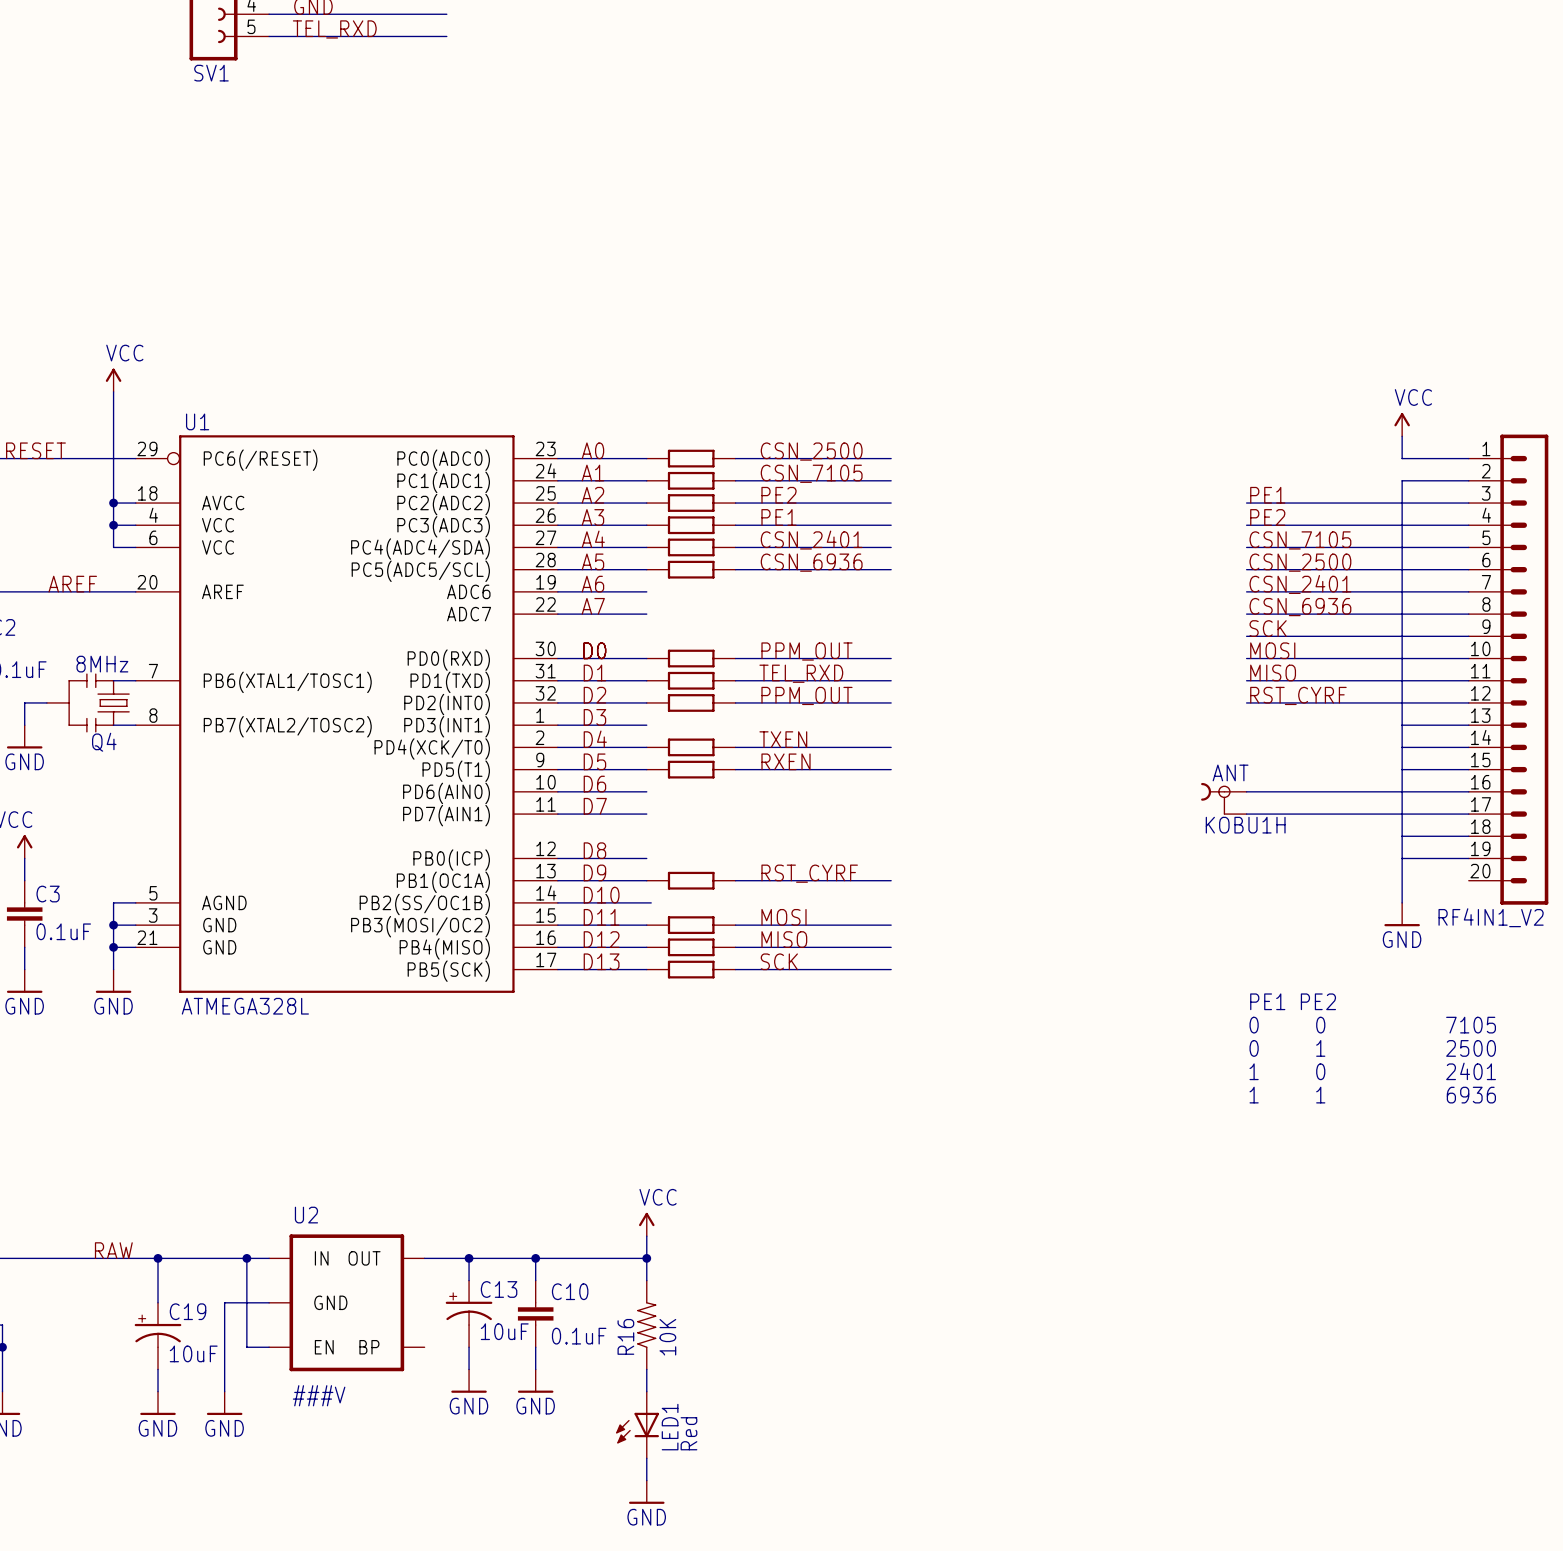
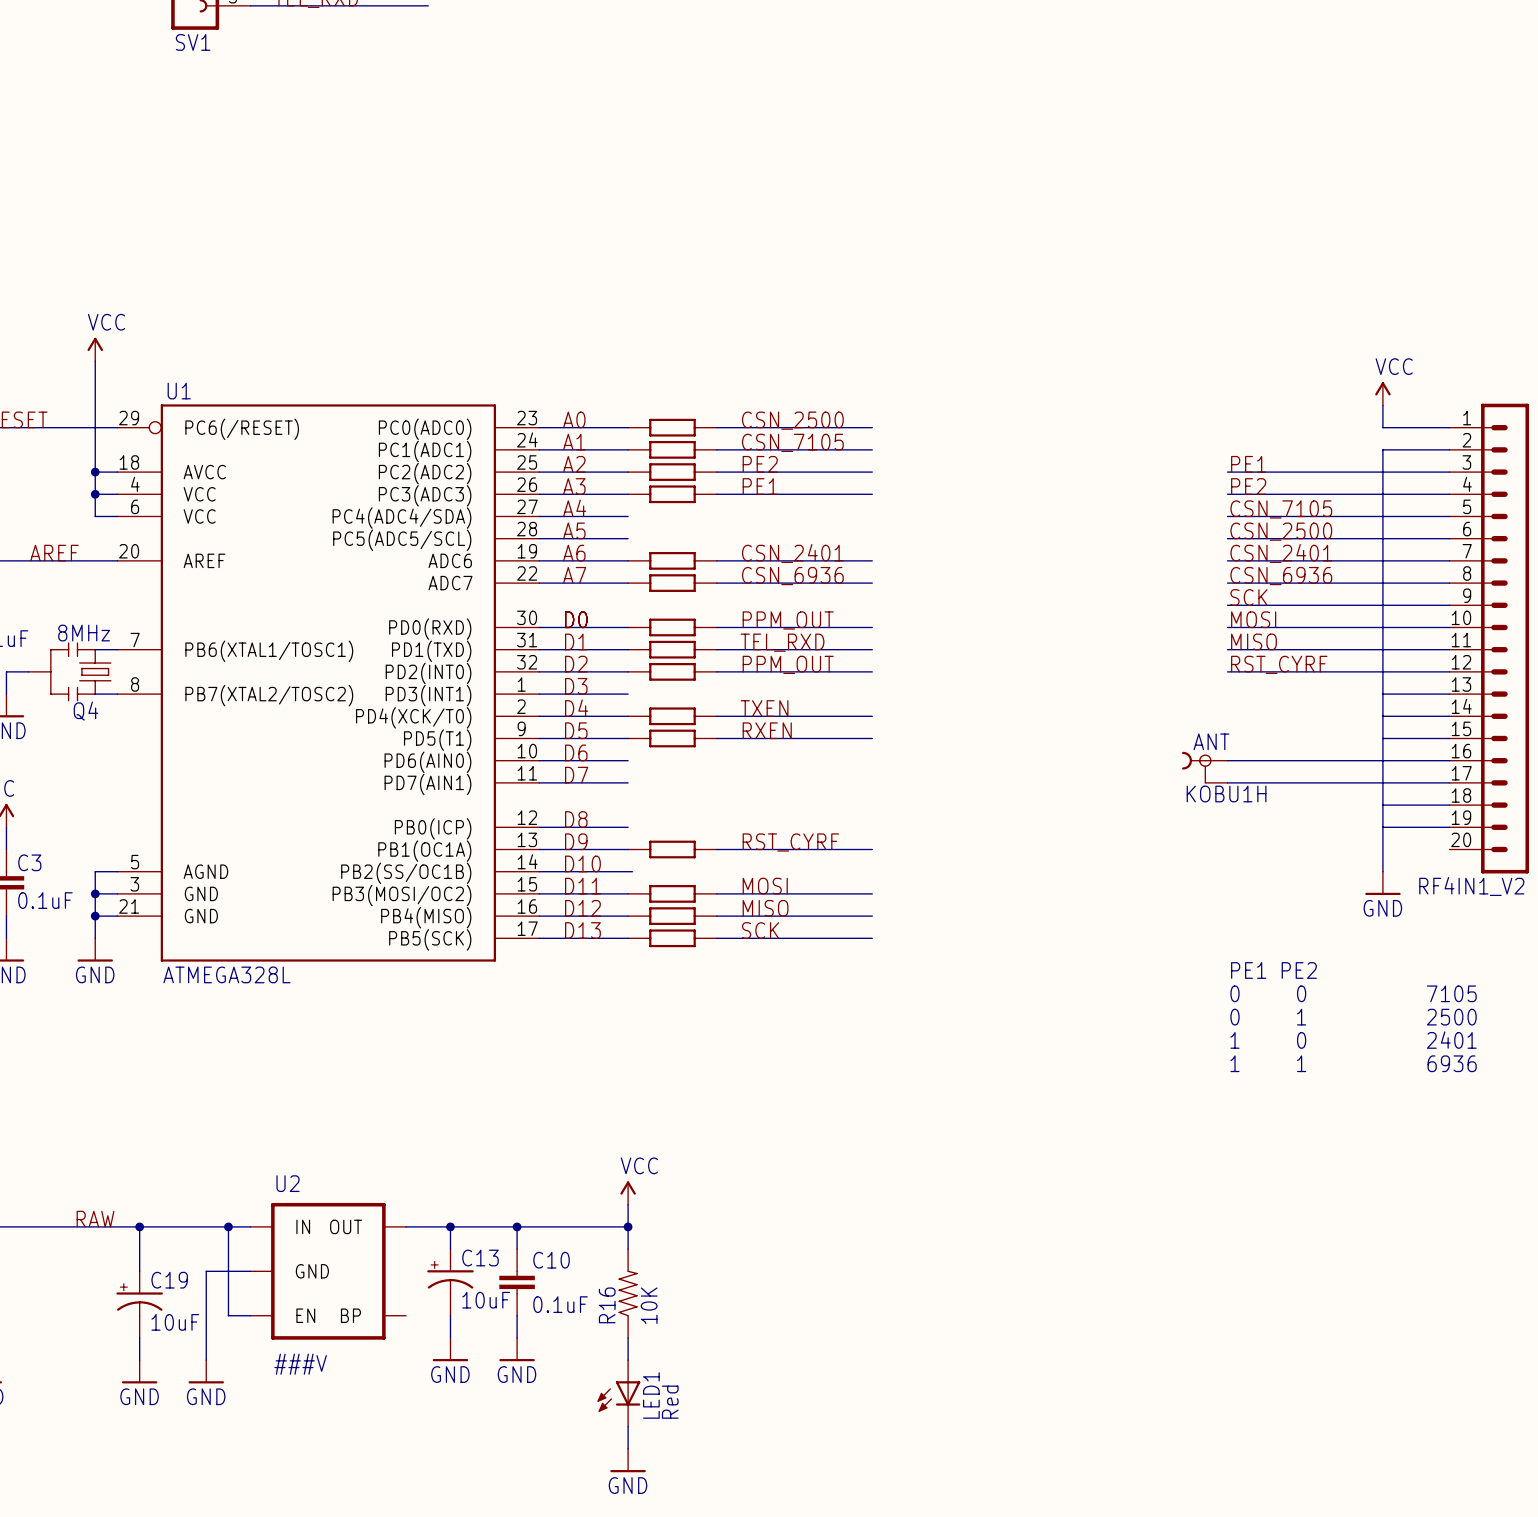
label position: CSN_2401 (811, 540) -> CSN_2401 (792, 553)
part: (691, 547) -> none
wire: (735, 547) (891, 547) -> (716, 560) (872, 560)
label position: CSN_6936 (811, 562) -> CSN_6936 (792, 576)
part: (691, 569) -> none
wire: (735, 569) (891, 569) -> (716, 583) (872, 583)
part: none -> (672, 560)
part: none -> (672, 583)

